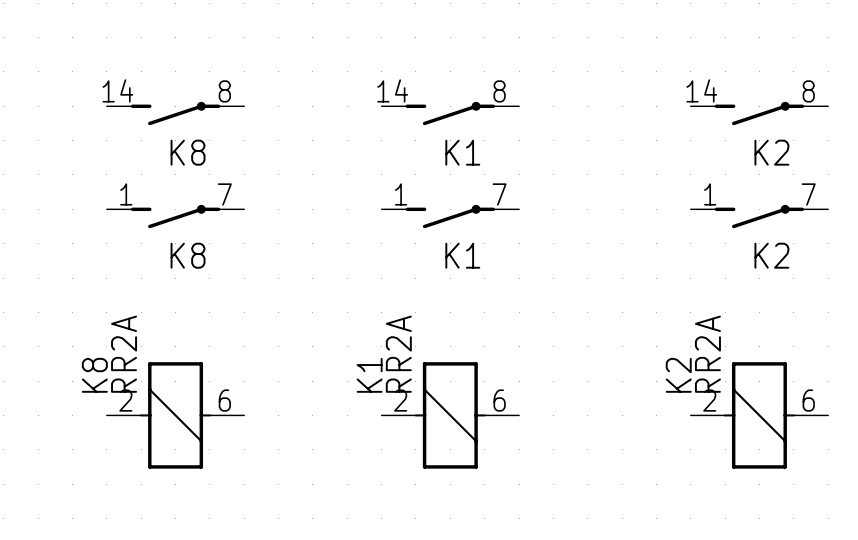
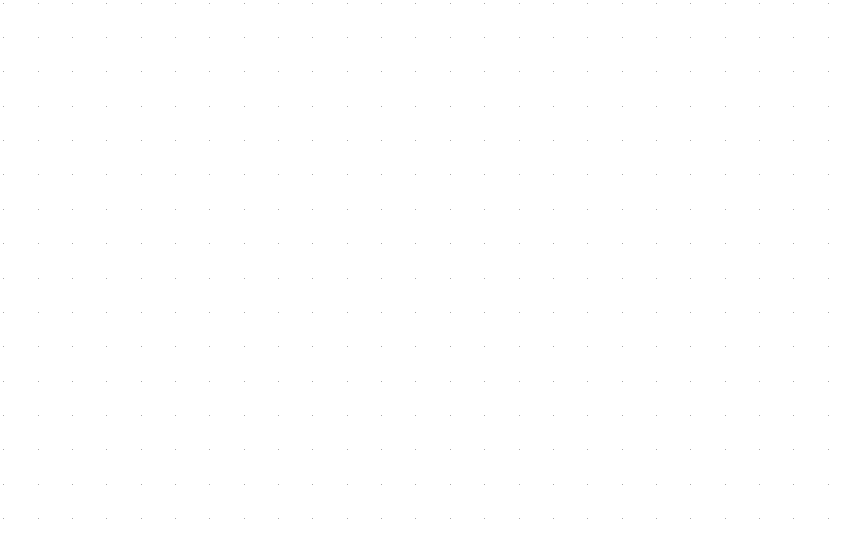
K8: (175, 113) -> none
K1: (450, 113) -> none
K2: (759, 113) -> none
K8: (175, 216) -> none
K1: (450, 216) -> none
K2: (759, 216) -> none
K8: RR2A (175, 415) -> none
K1: RR2A (450, 415) -> none
K2: RR2A (759, 415) -> none

